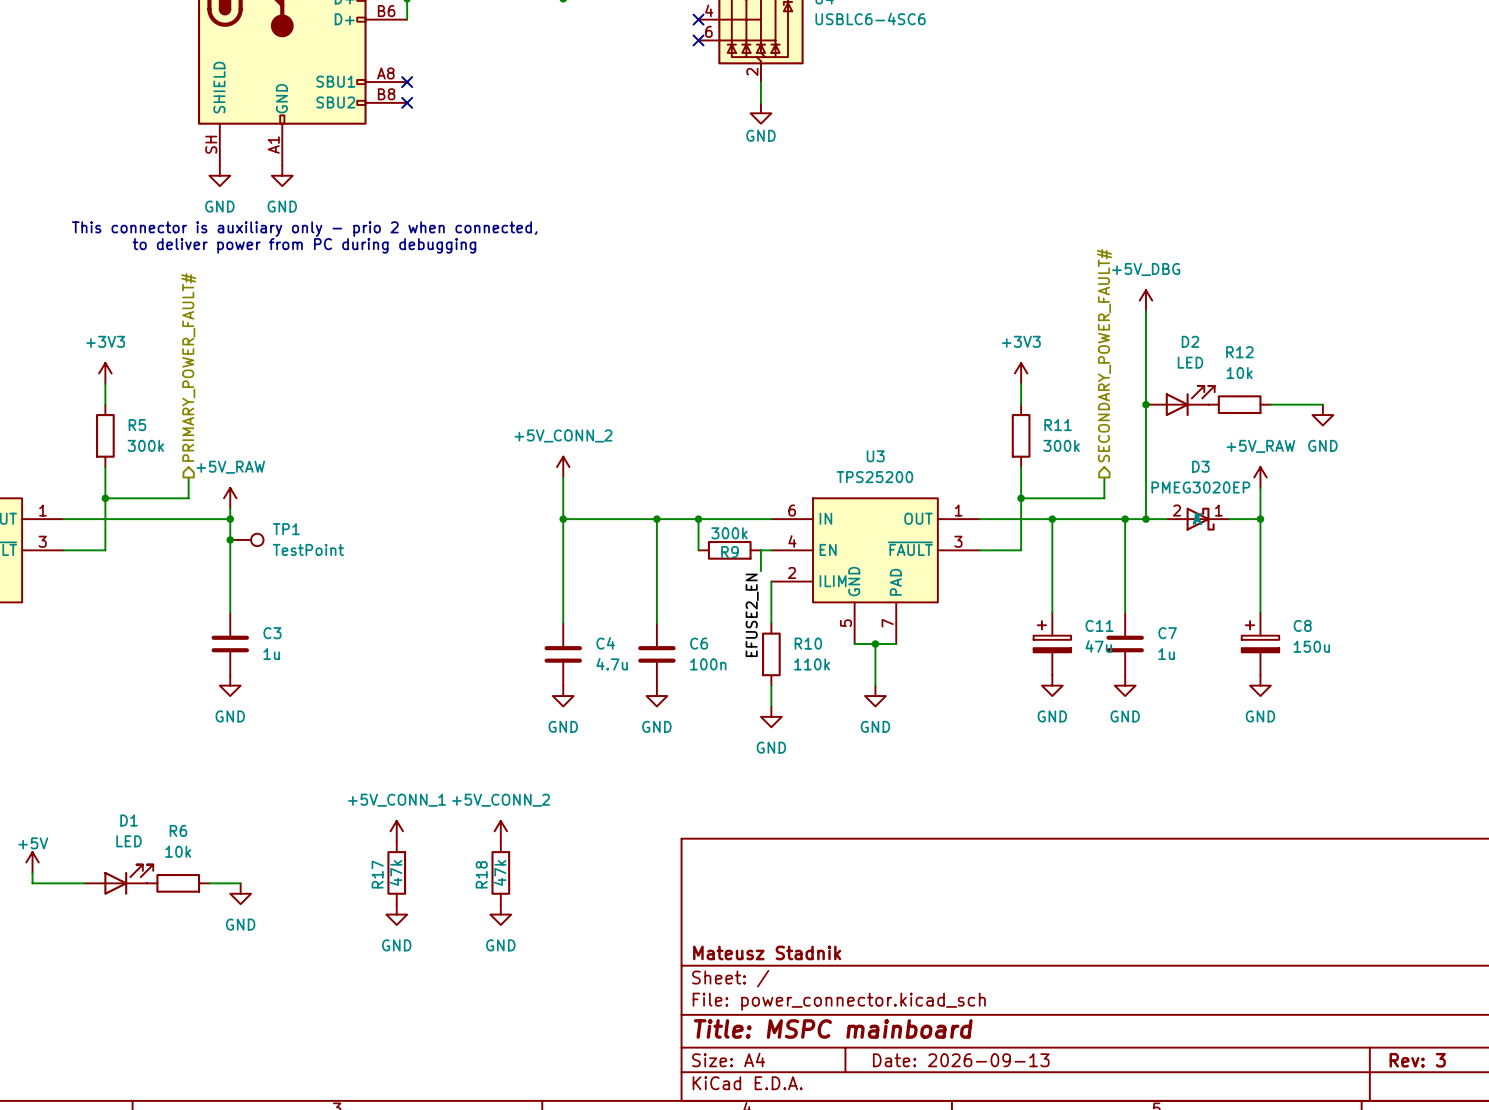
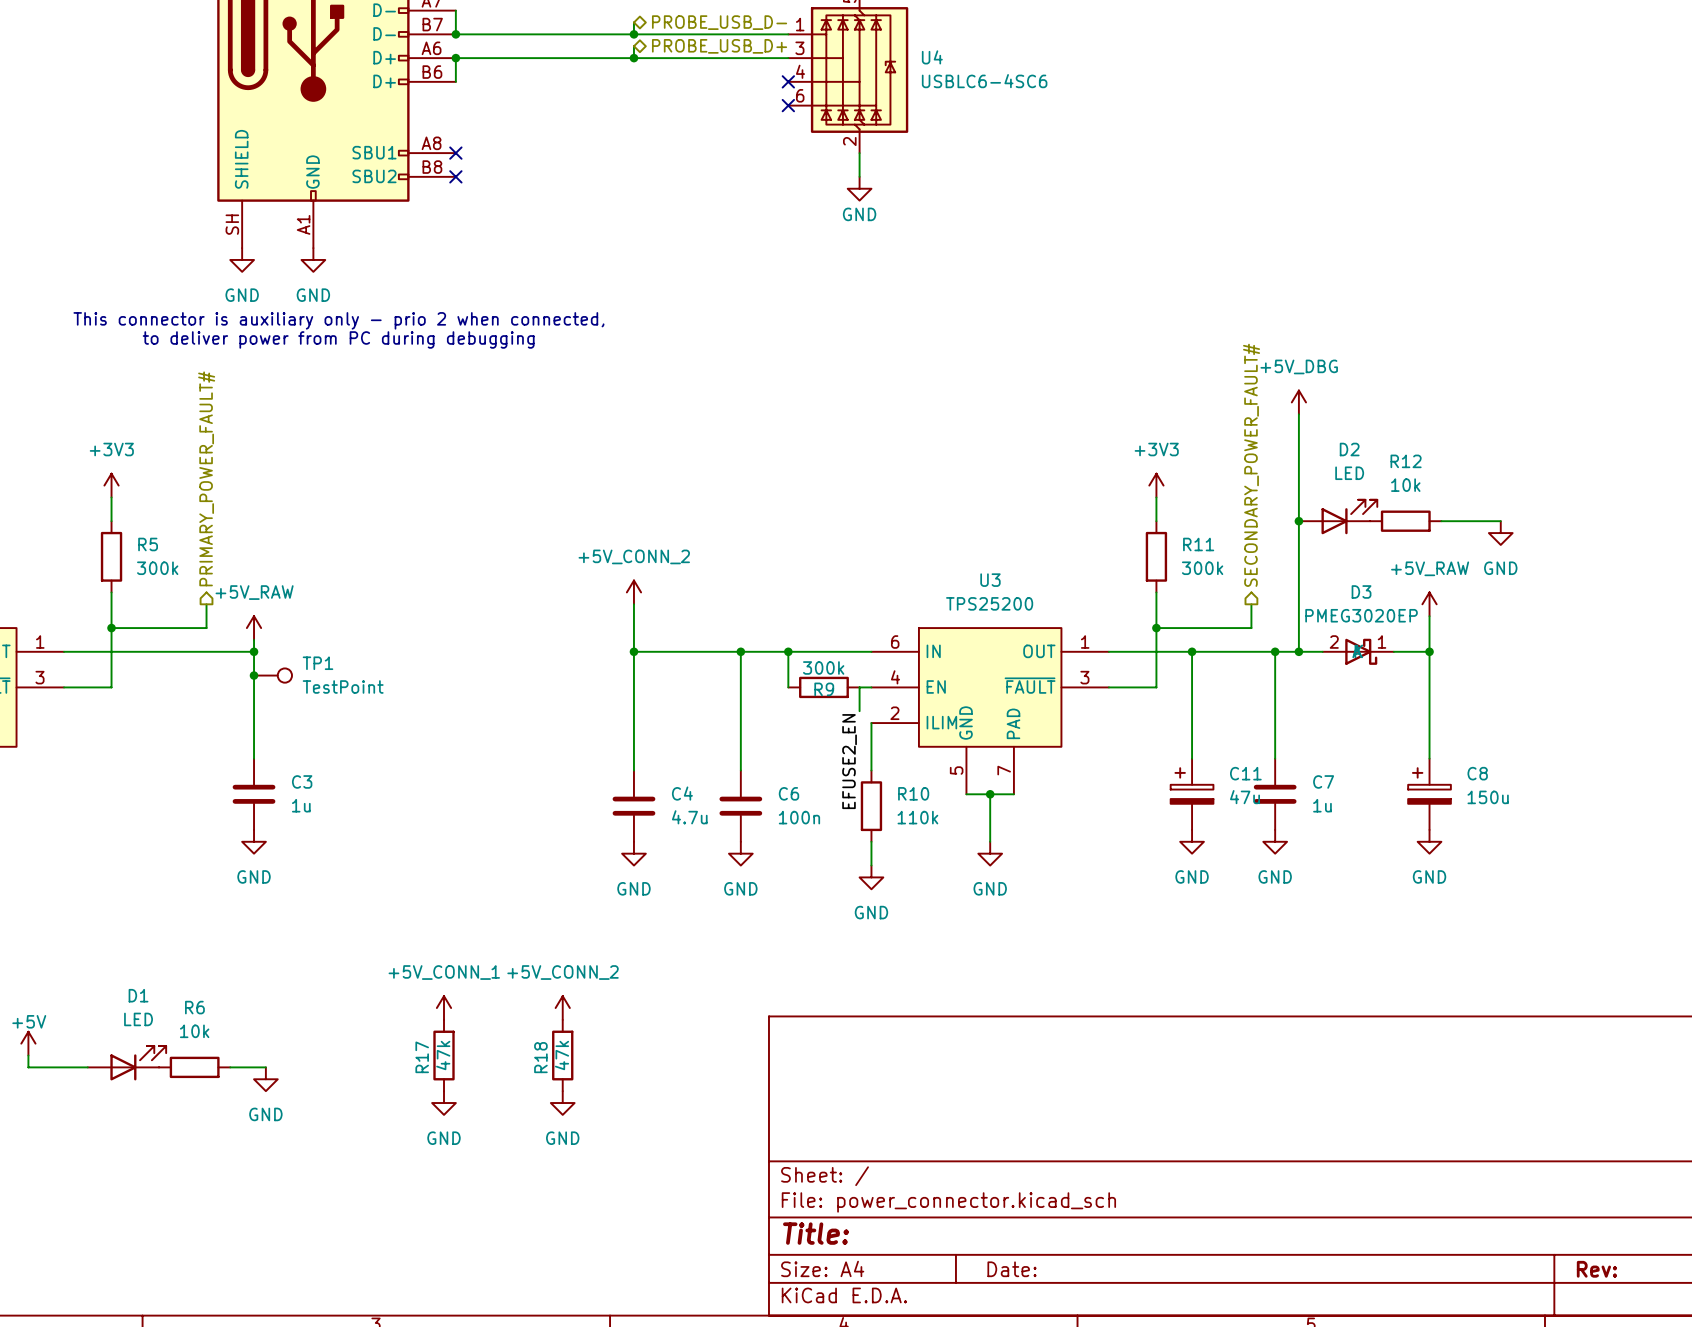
title block: Mateusz Stadnik (767, 952) -> none
title block: Title: MSPC mainboard (833, 1028) -> Title: (816, 1233)
title block: Date: 2026-09-13 (961, 1060) -> Date: (1012, 1269)
title block: Rev: 3 (1417, 1060) -> Rev: (1596, 1269)

